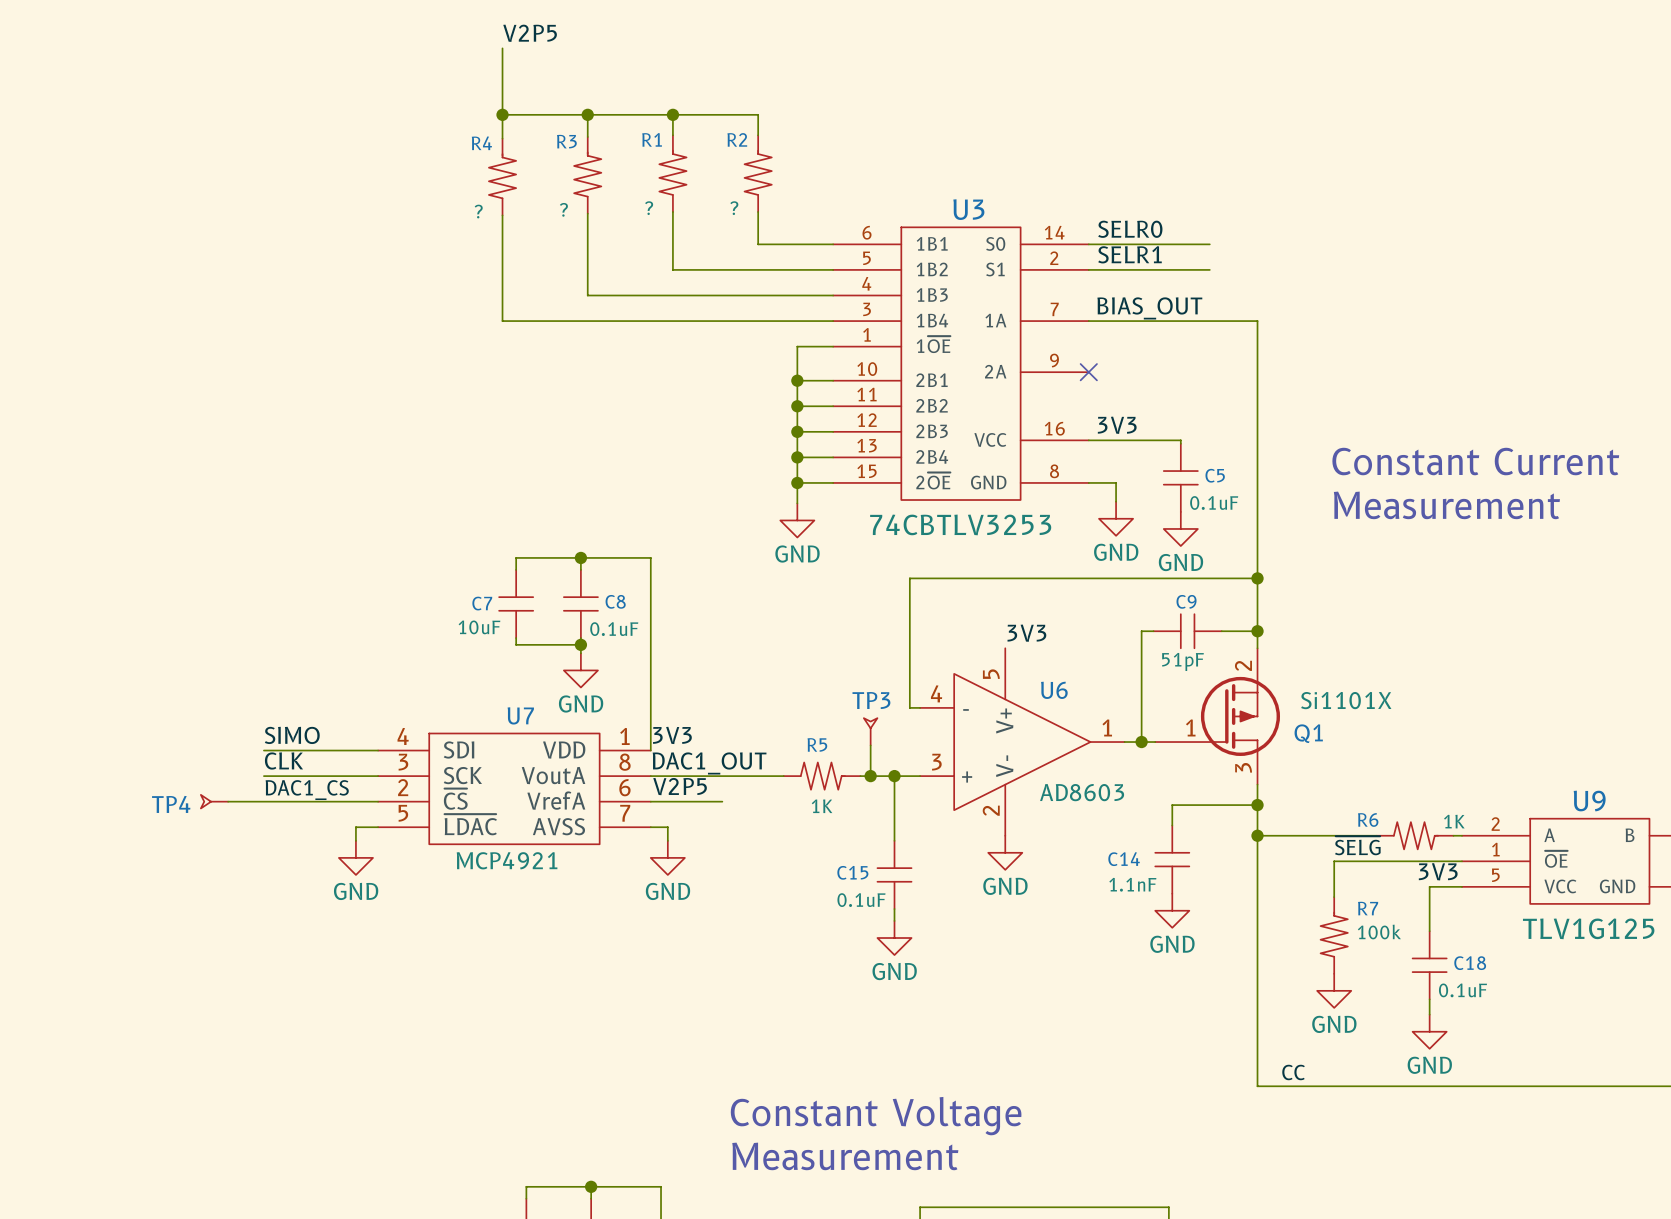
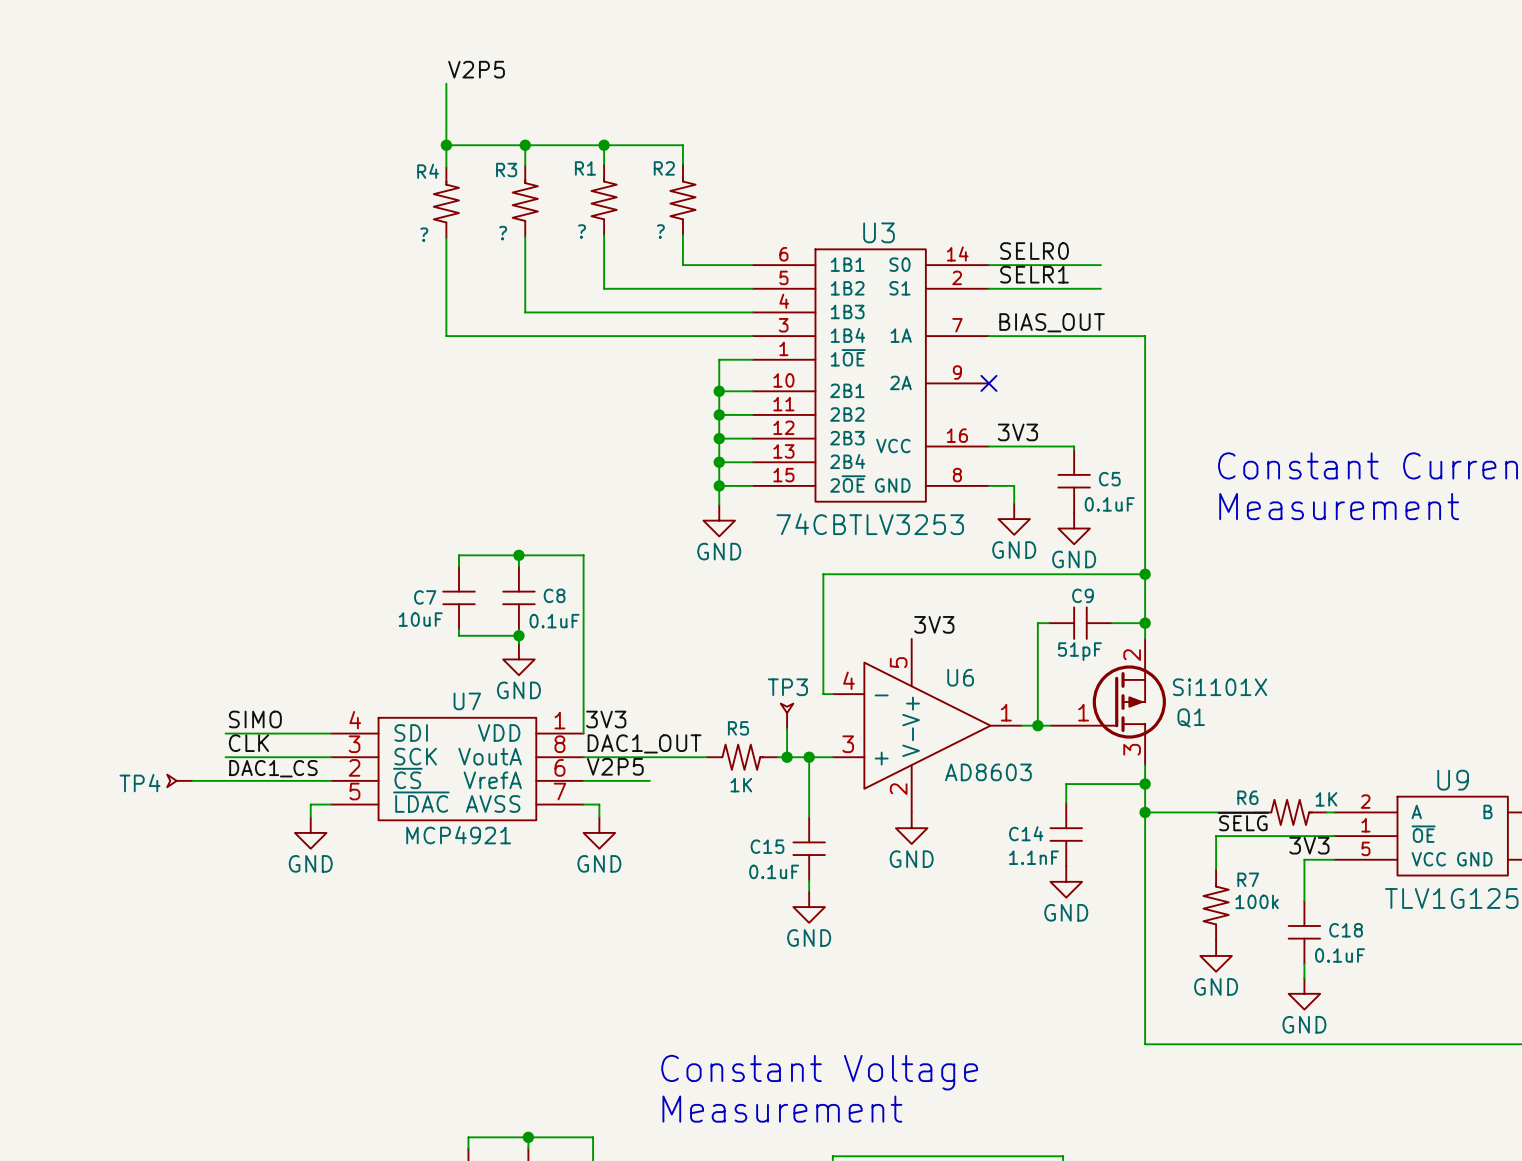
label: CC (1293, 1072) -> none

